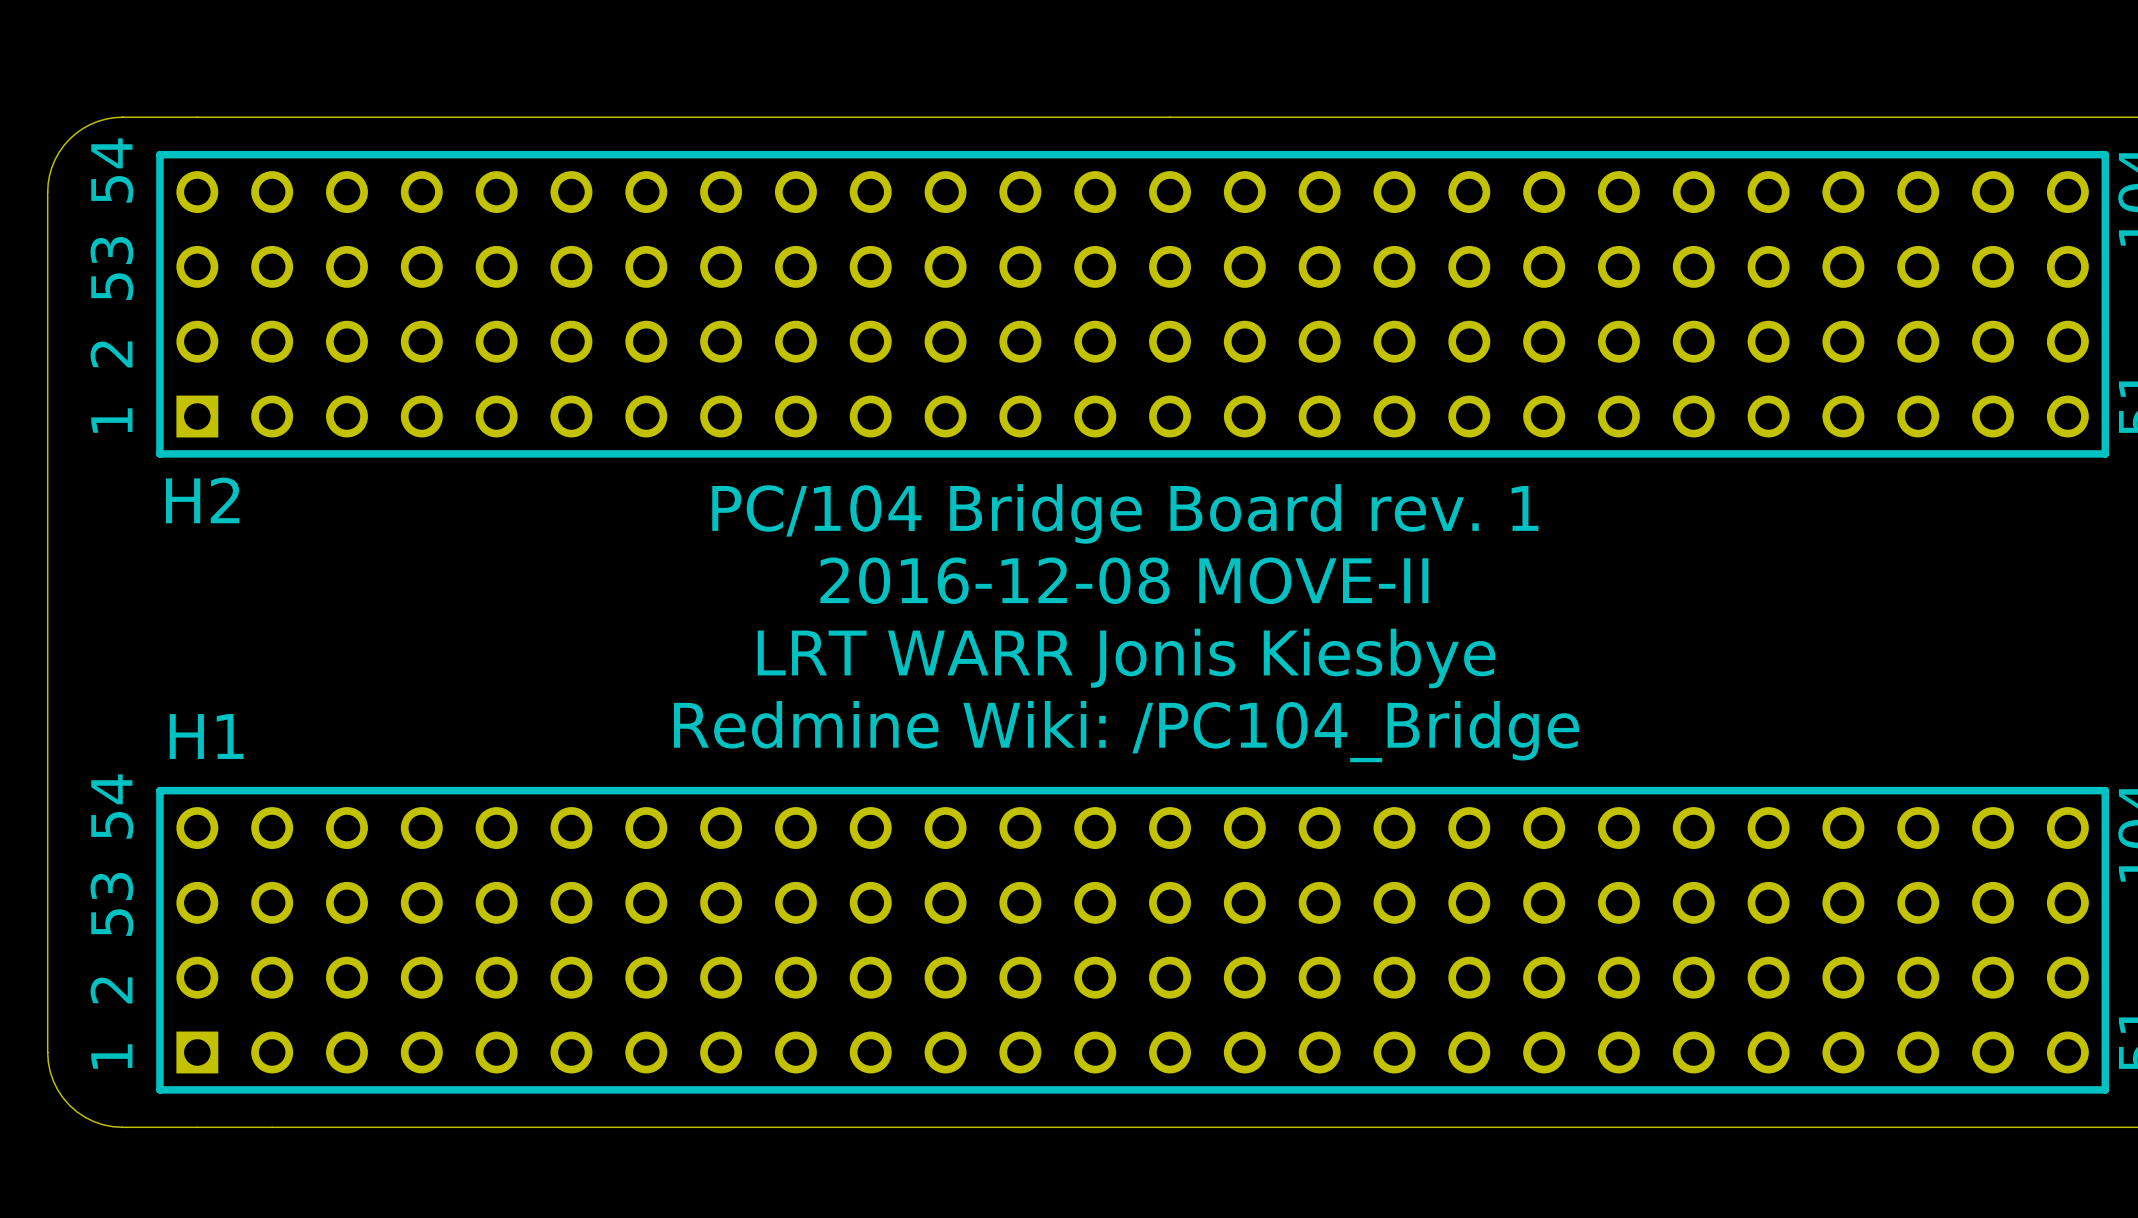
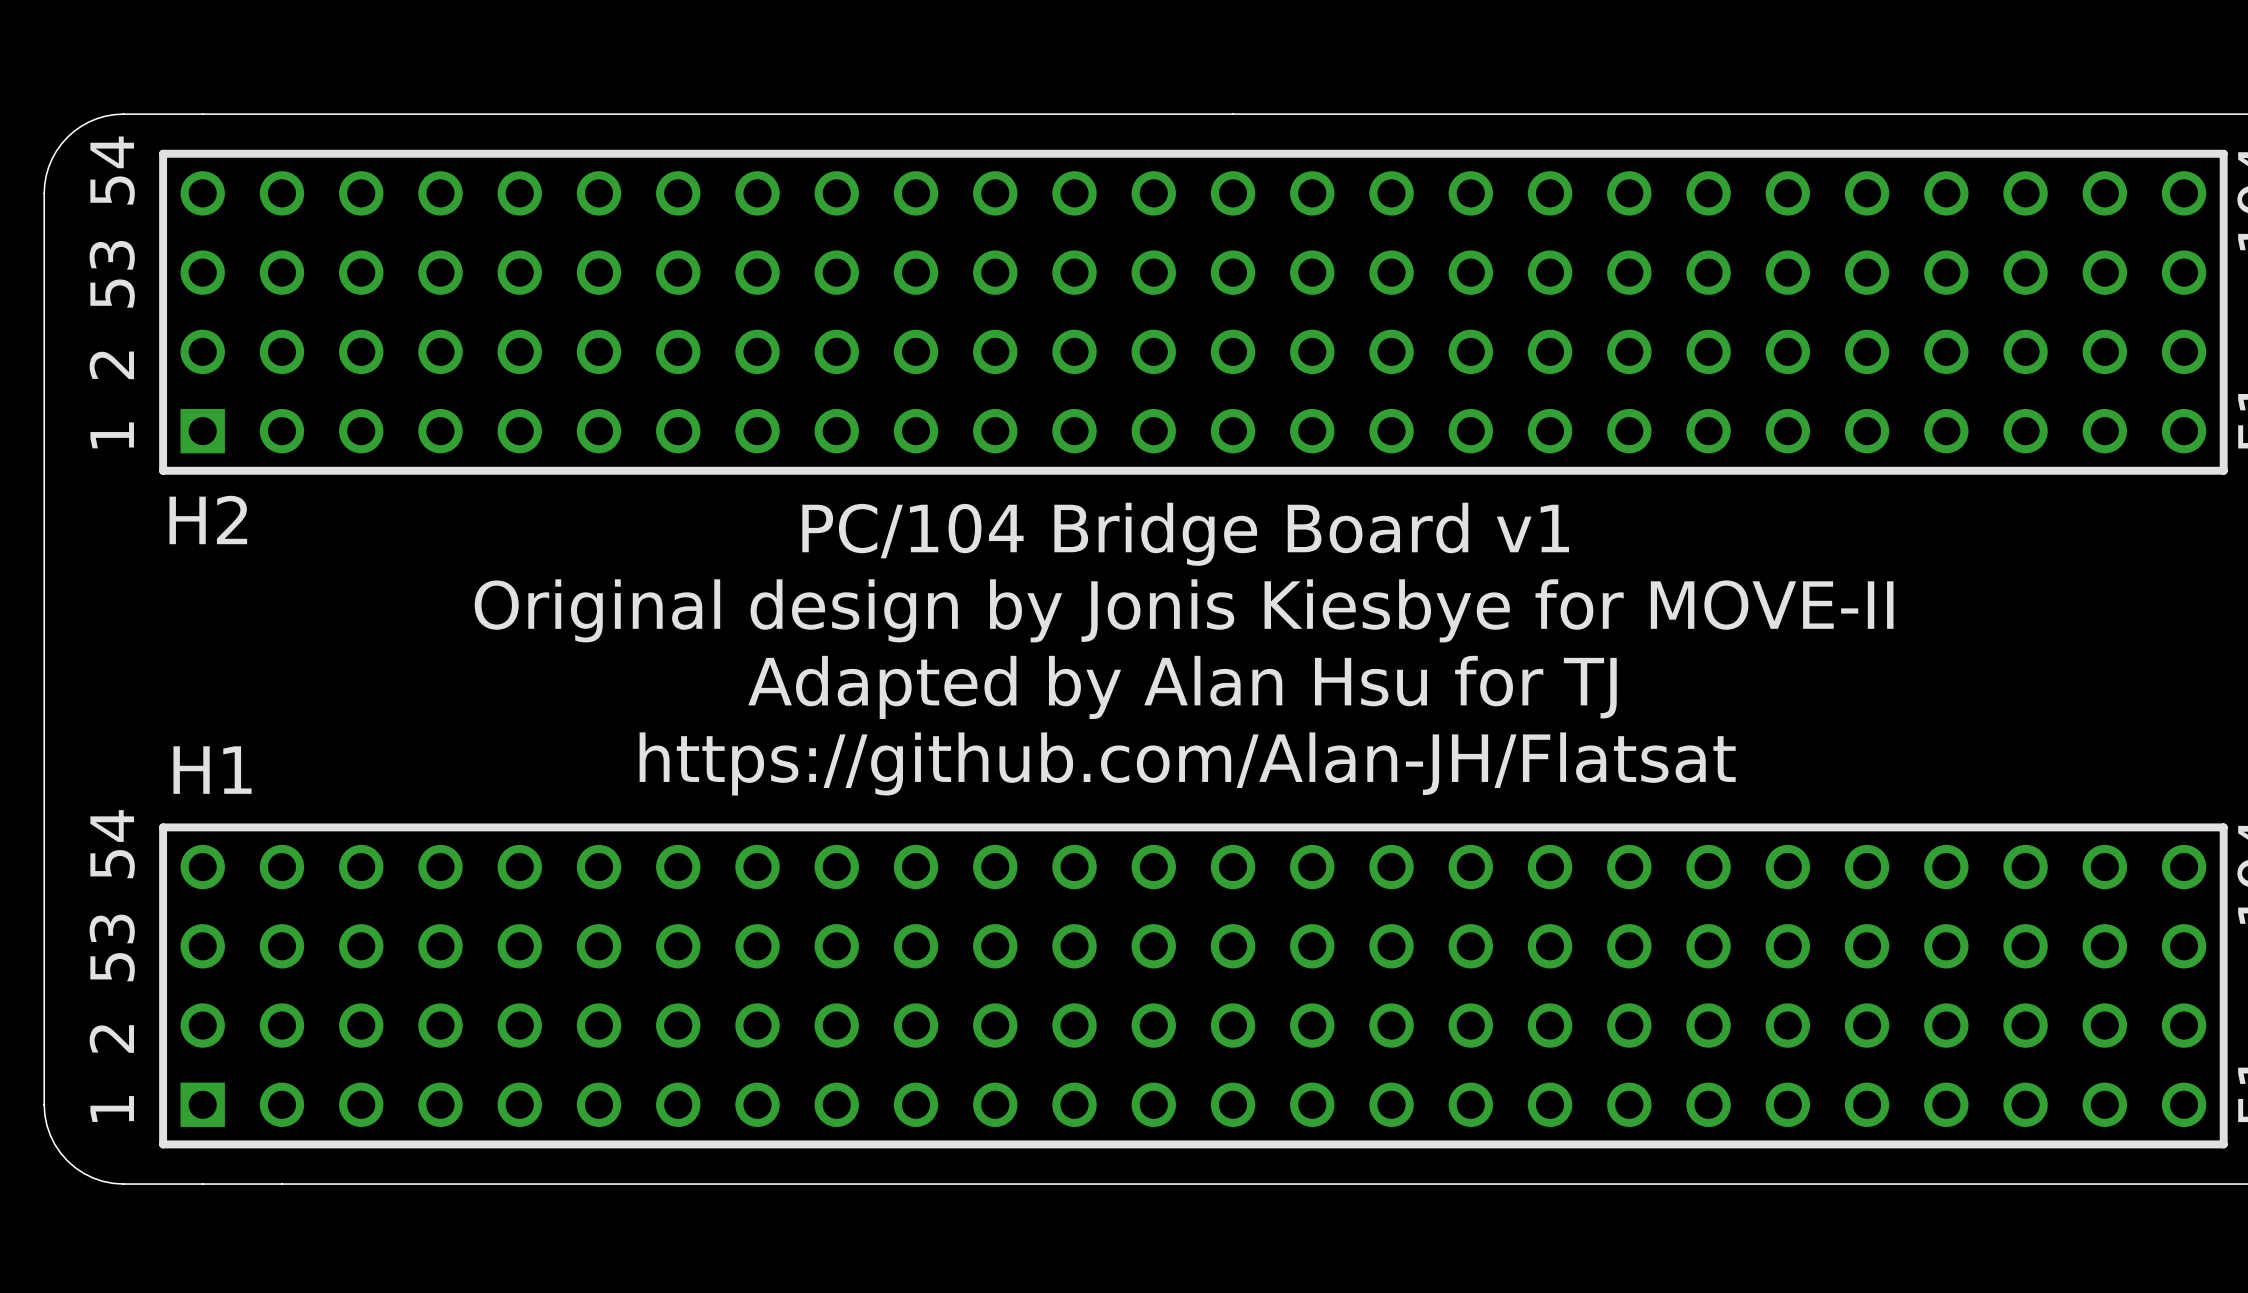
text: PC/104 Bridge Board rev. 1 (1125, 513) -> PC/104 Bridge Board v1 (1185, 534)
text: 2016-12-08 MOVE-II (1124, 580) -> Original design by Jonis Kiesbye for MOVE-II (1184, 610)
text: LRT WARR Jonis Kiesbye (1126, 658) -> Adapted by Alan Hsu for TJ (1182, 687)
text: Redmine Wiki: /PC104_Bridge (1126, 731) -> https://github.com/Alan-JH/Flatsat (1187, 763)

